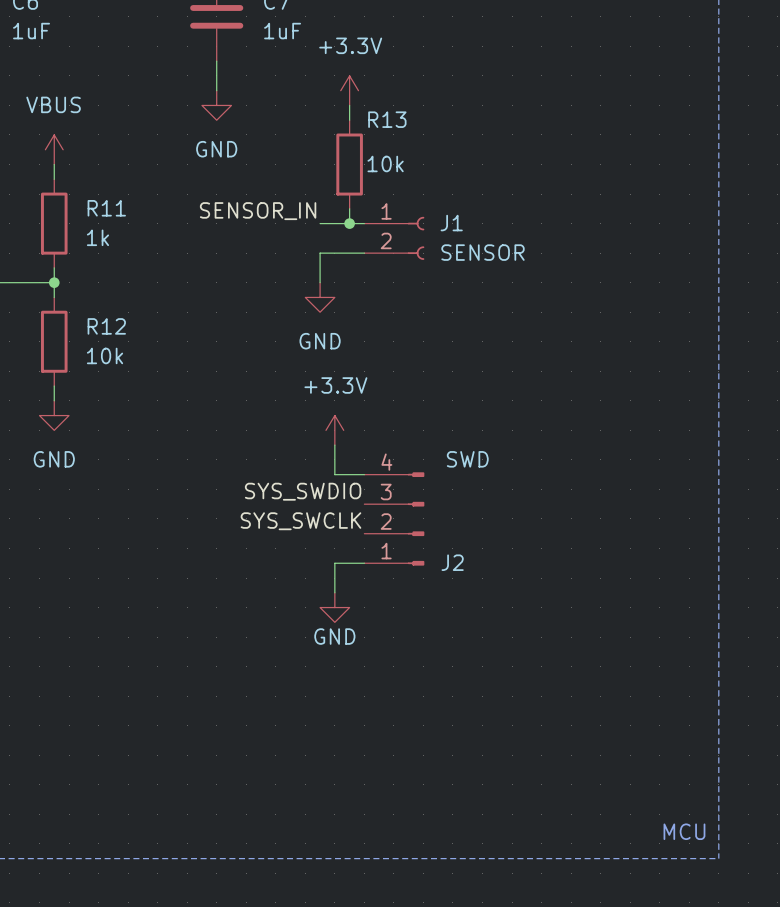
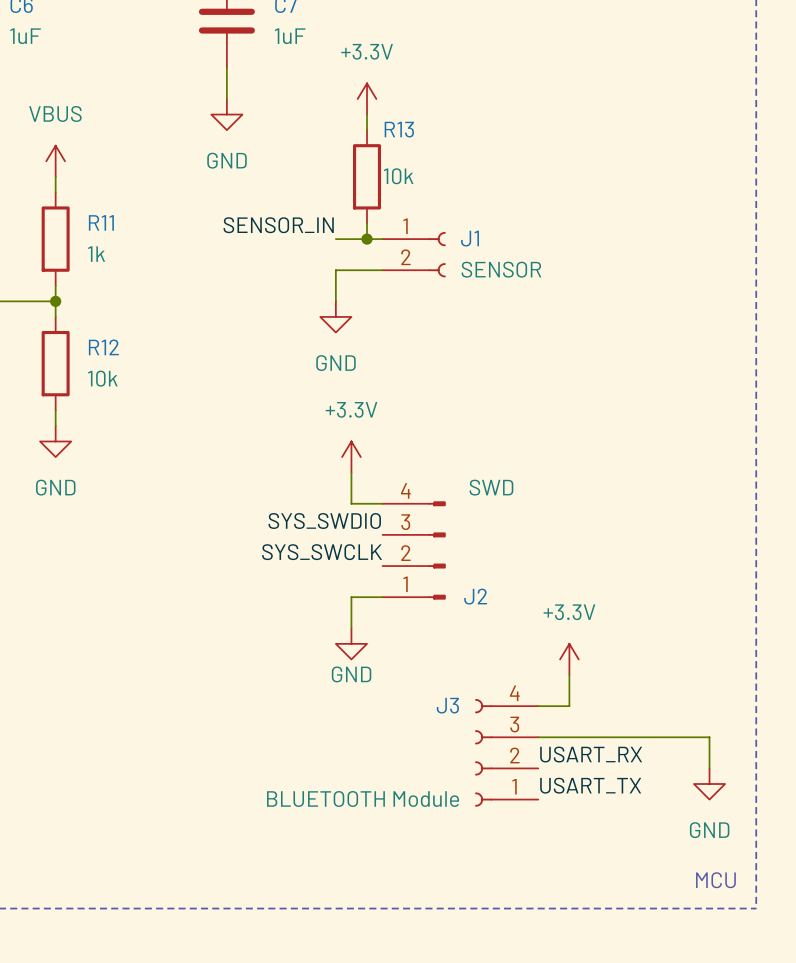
power symbol: none -> +3.3V (569, 659)
wire: none -> (569, 675) (569, 706) (538, 706)
wire: none -> (538, 737) (709, 737) (709, 768)
J3: none -> BLUETOOTH Module (506, 752)
label: none -> USART_RX (591, 754)
power symbol: none -> GND (709, 783)
label: none -> USART_TX (590, 785)

